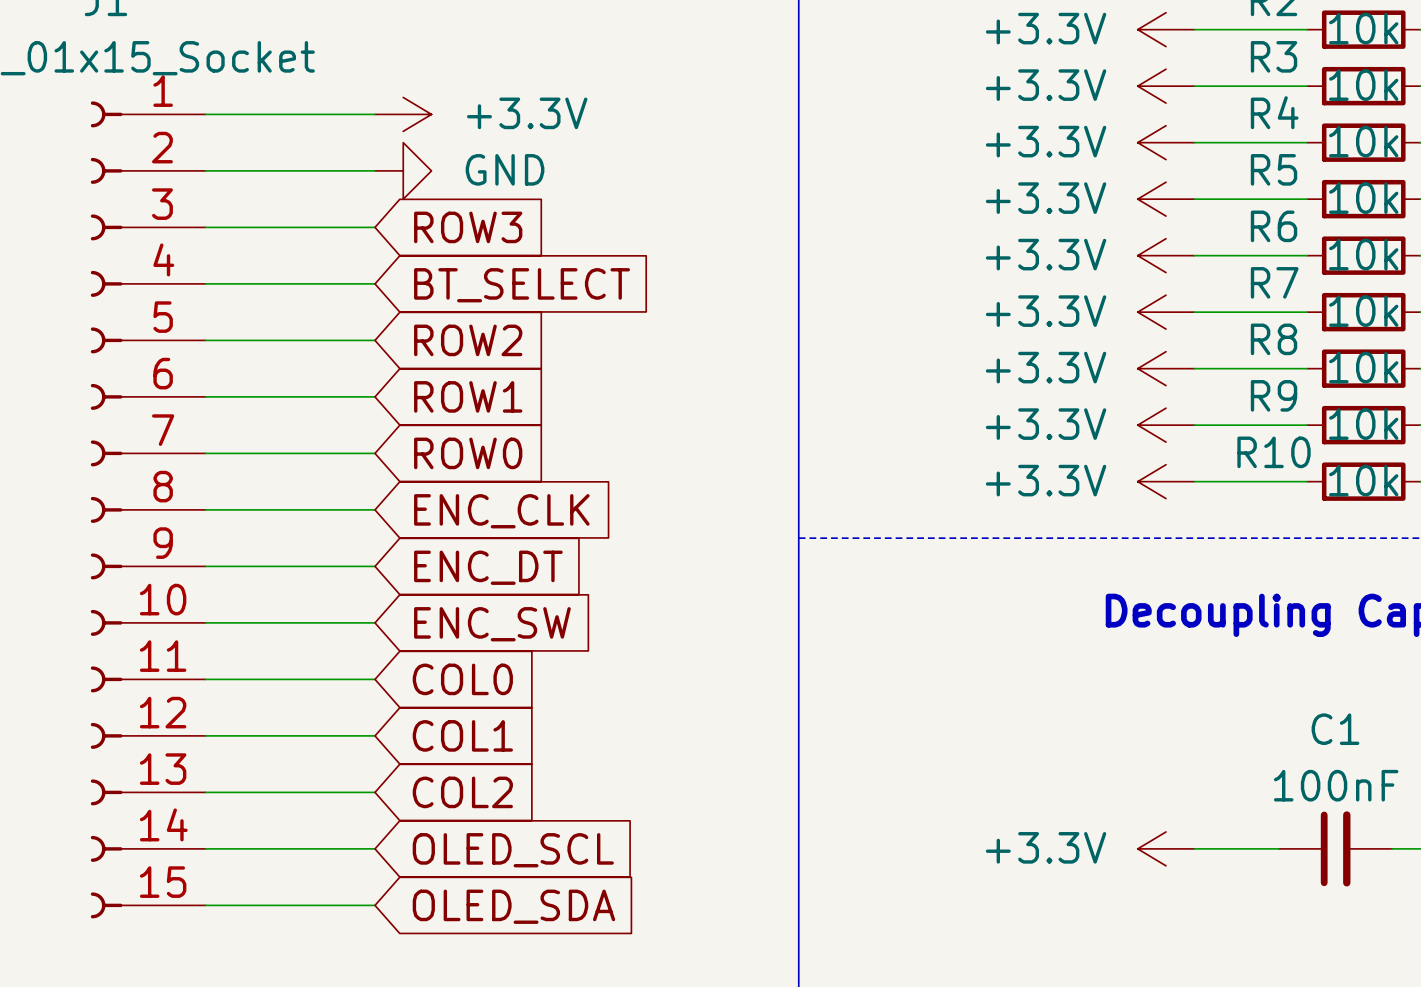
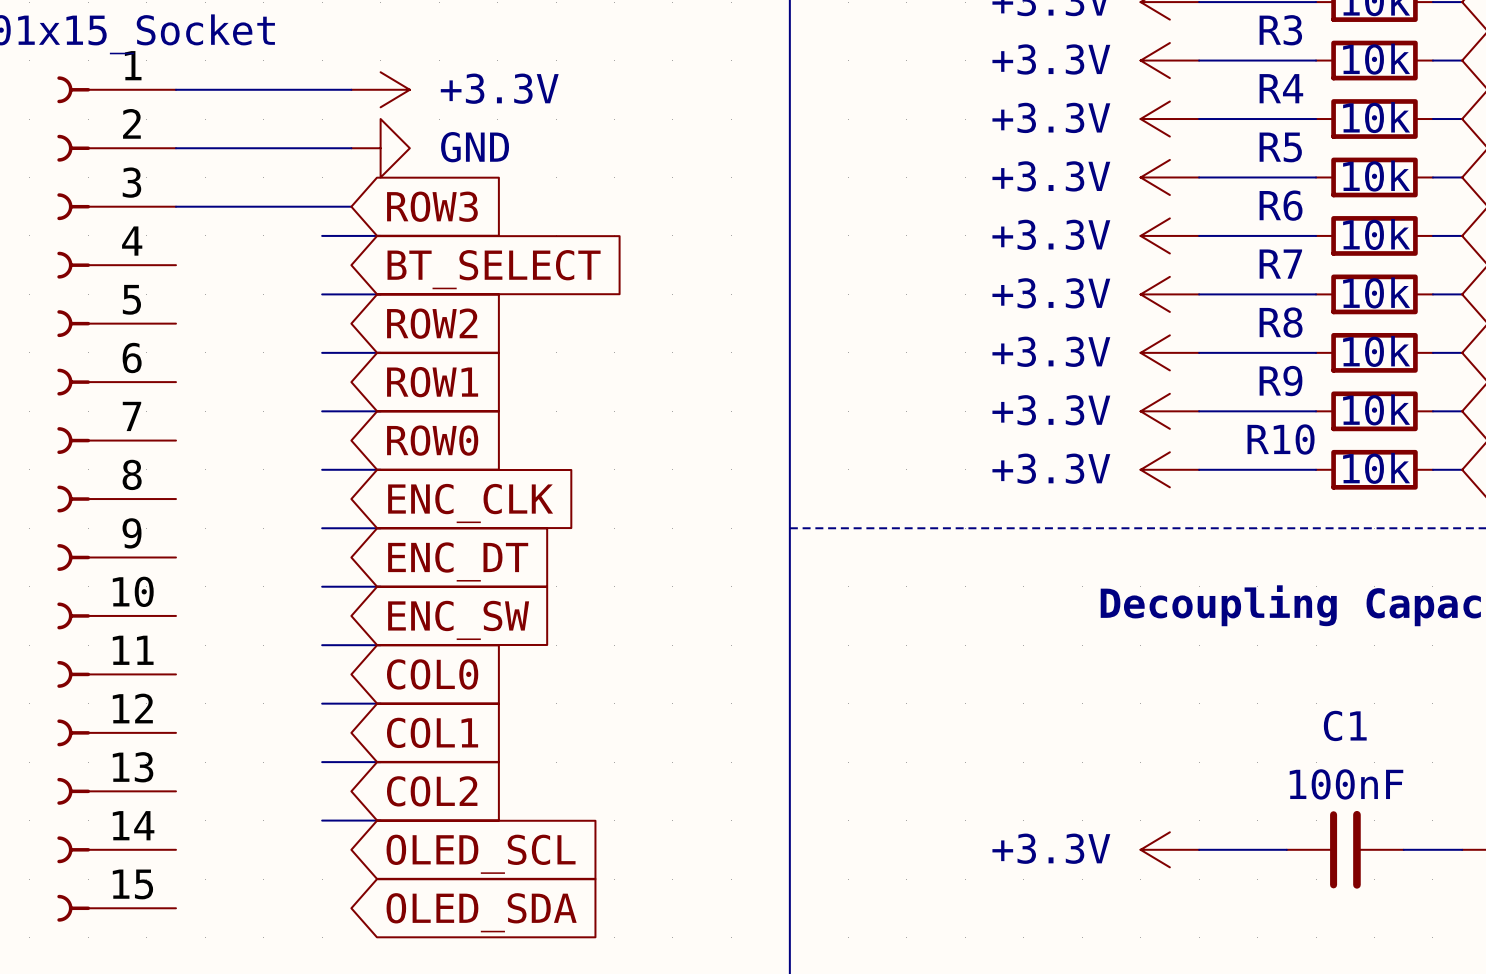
wire: none -> (322, 235) (380, 235)
wire: (205, 283) (375, 283) -> none
wire: none -> (322, 294) (380, 294)
wire: (205, 340) (375, 340) -> none
wire: none -> (322, 352) (380, 352)
wire: (205, 396) (375, 396) -> none
wire: none -> (322, 411) (380, 411)
wire: (205, 453) (375, 453) -> none
wire: none -> (322, 469) (380, 469)
wire: (205, 509) (375, 509) -> none
wire: none -> (322, 528) (380, 528)
wire: (205, 566) (375, 566) -> none
wire: none -> (322, 586) (380, 586)
wire: (205, 622) (375, 622) -> none
wire: none -> (322, 645) (380, 645)
wire: (205, 679) (375, 679) -> none
wire: none -> (322, 703) (380, 703)
wire: (205, 735) (375, 735) -> none
wire: none -> (322, 762) (380, 762)
wire: (205, 792) (375, 792) -> none
wire: none -> (322, 820) (380, 820)
wire: (205, 848) (375, 848) -> none
wire: (205, 905) (375, 905) -> none

